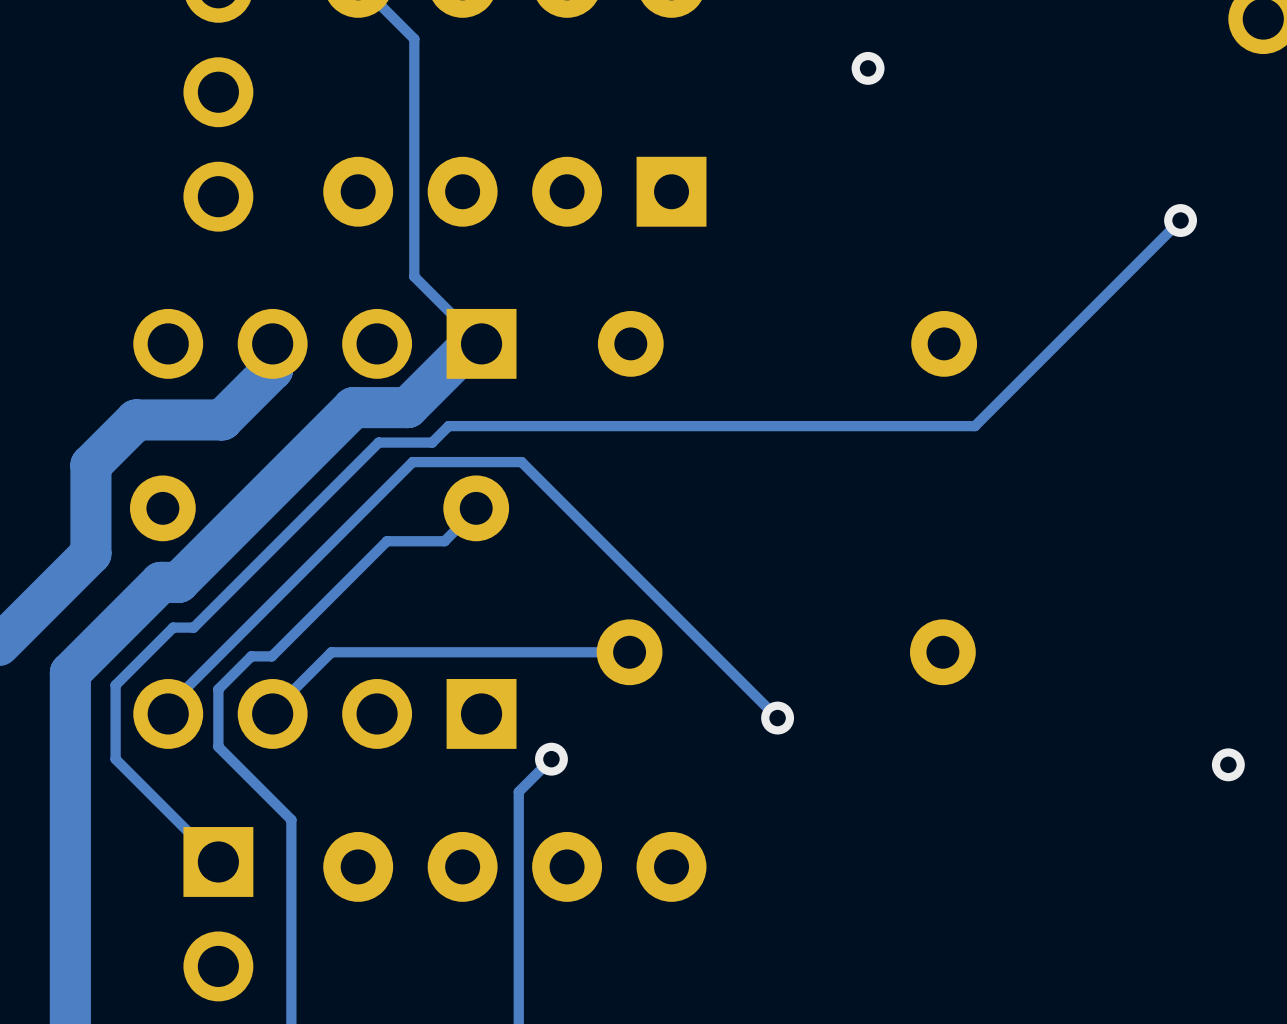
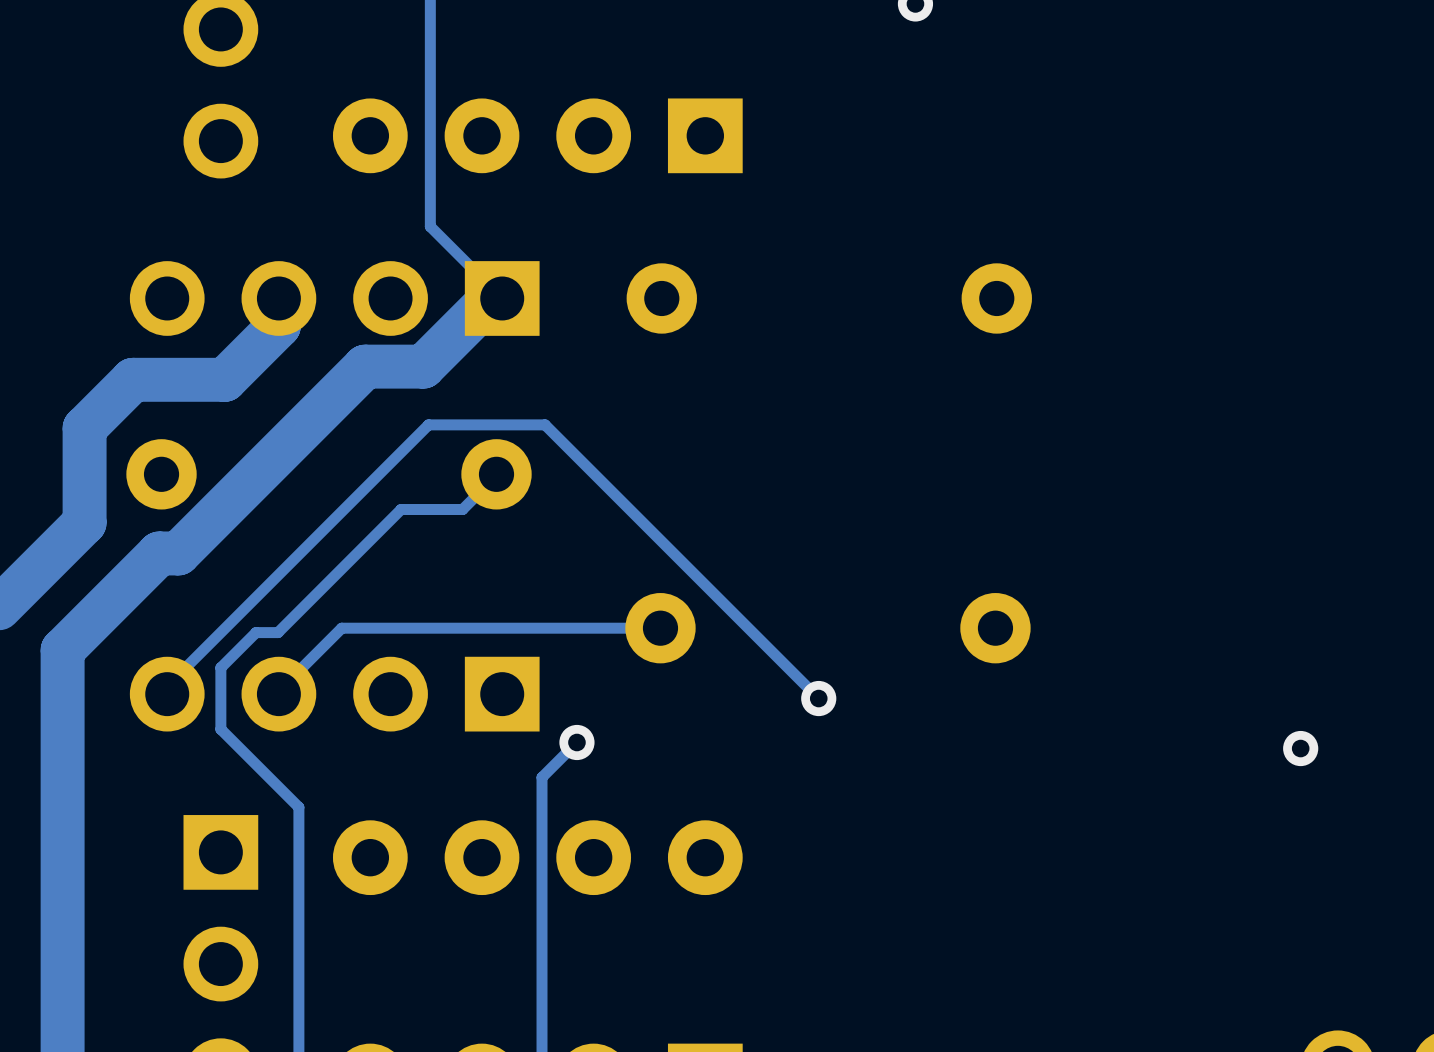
track: (1180, 220) (974, 426) (448, 426) (432, 442) (378, 442) (193, 627) (173, 627) (115, 685) (115, 759) (214, 857) -> none
via: (1180, 220) -> none

